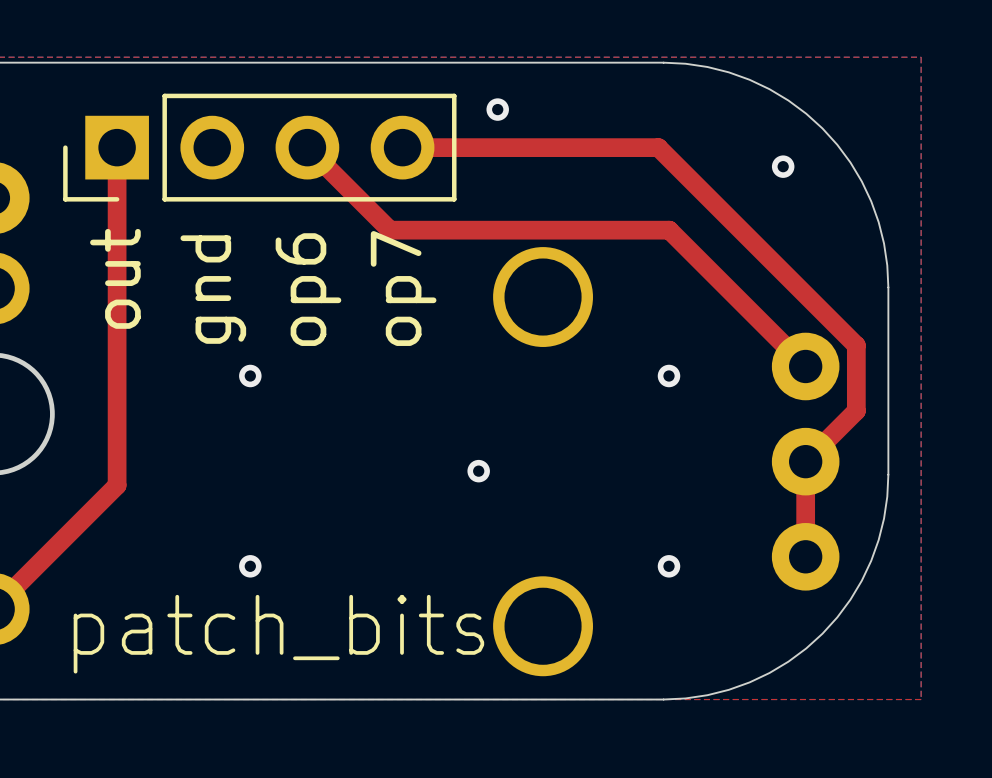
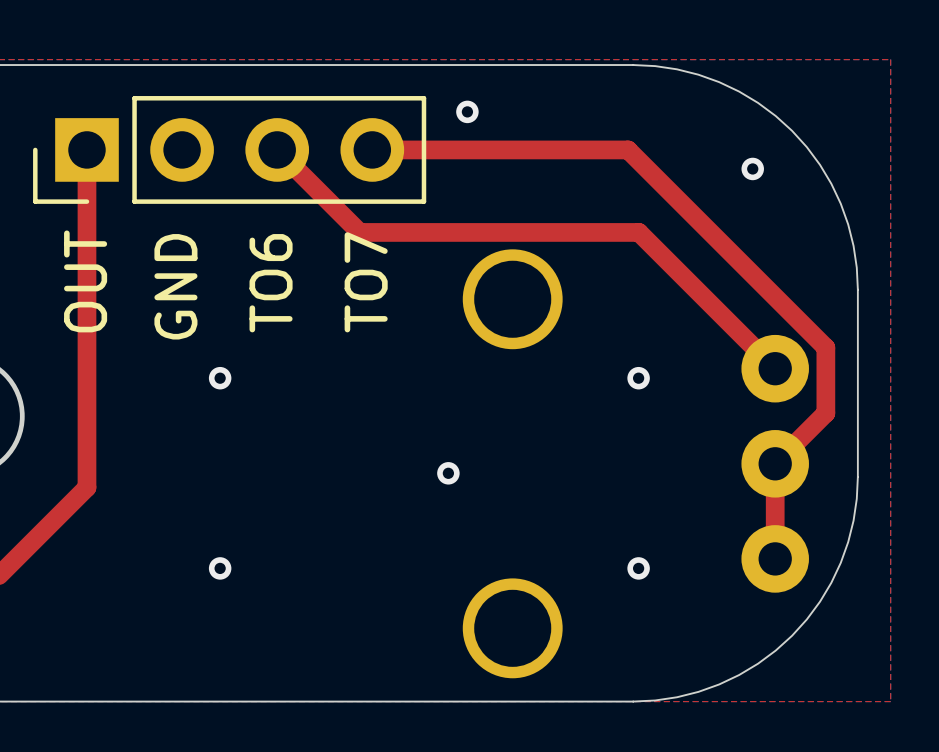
text: out (115, 278) -> OUT (85, 281)
text: op7 (403, 288) -> TO7 (366, 282)
text: gnd (213, 289) -> GND (175, 286)
text: op6 (308, 289) -> TO6 (271, 283)
text: patch_bits (278, 634) -> none

